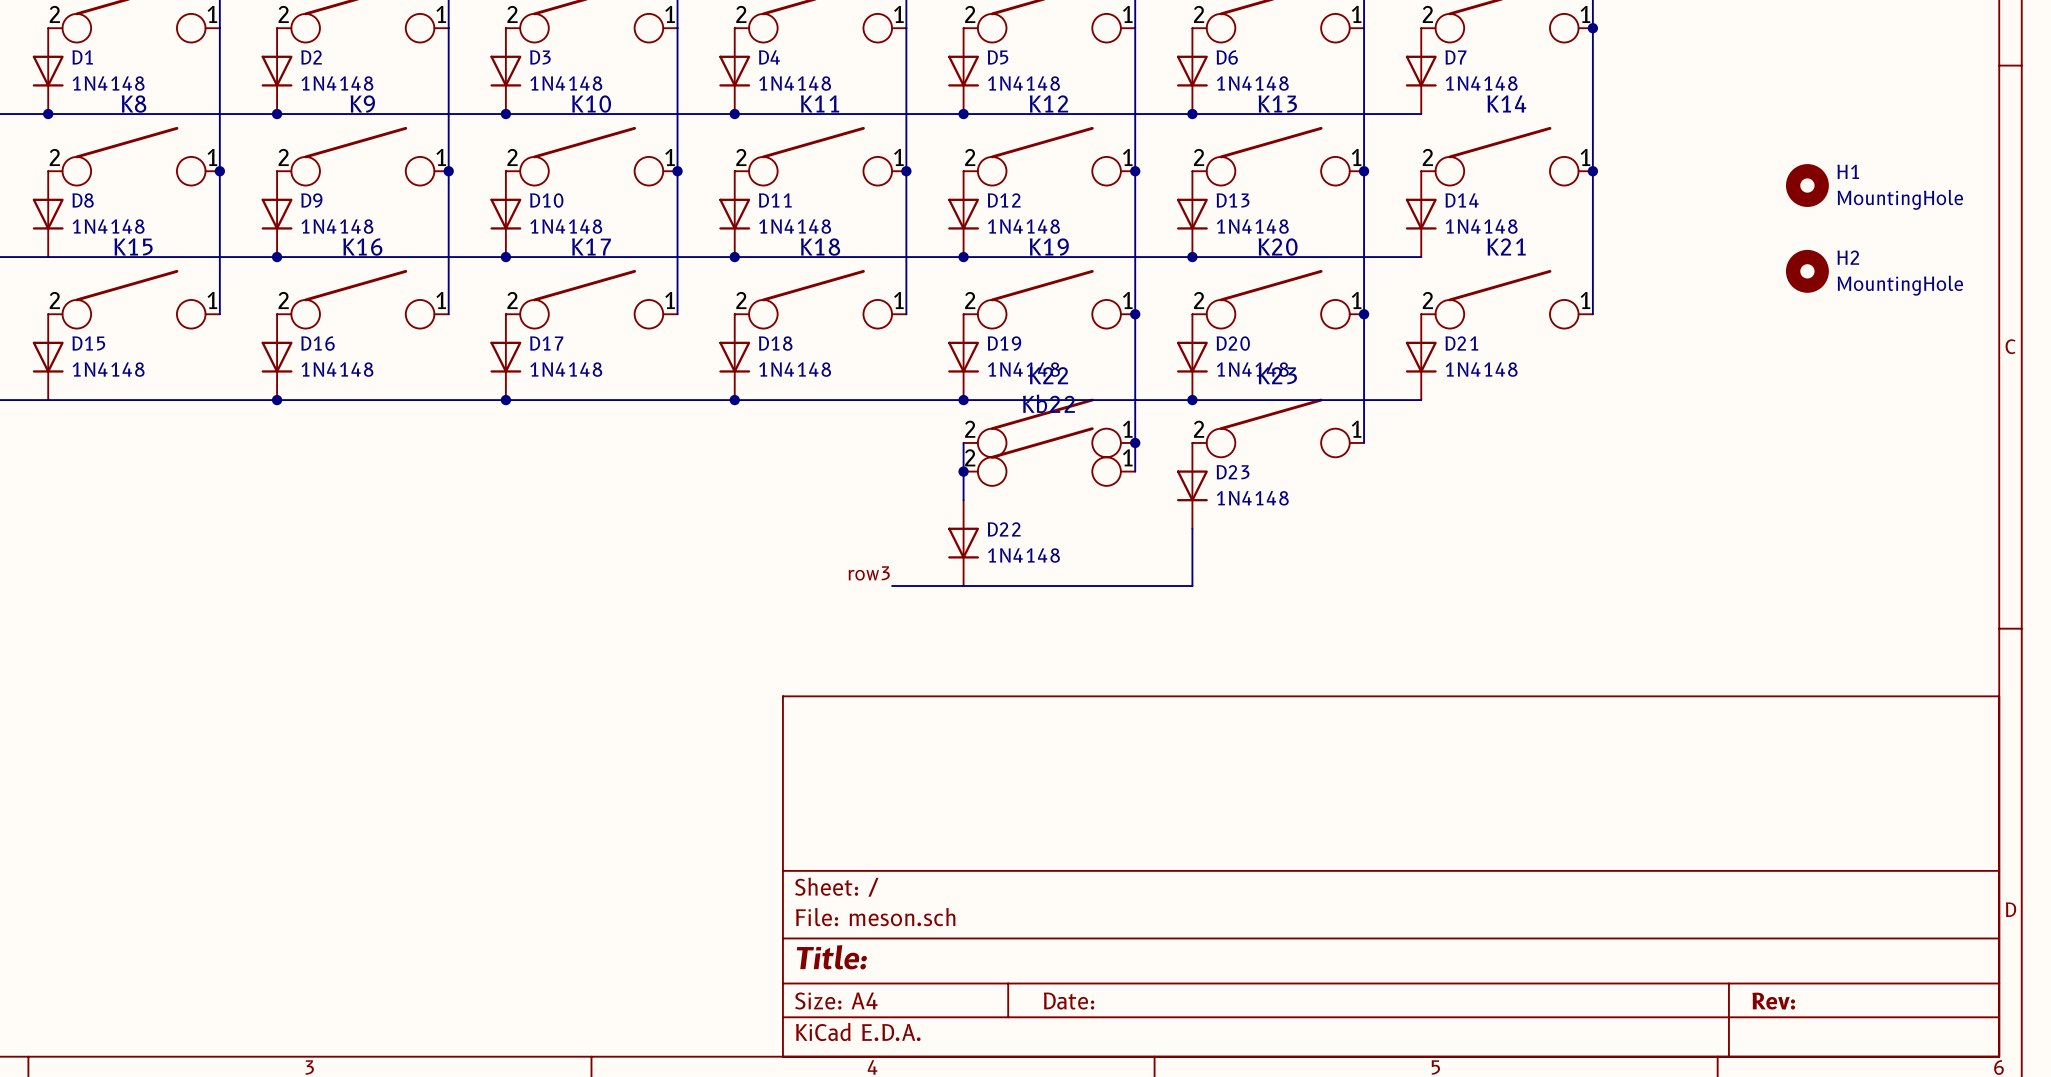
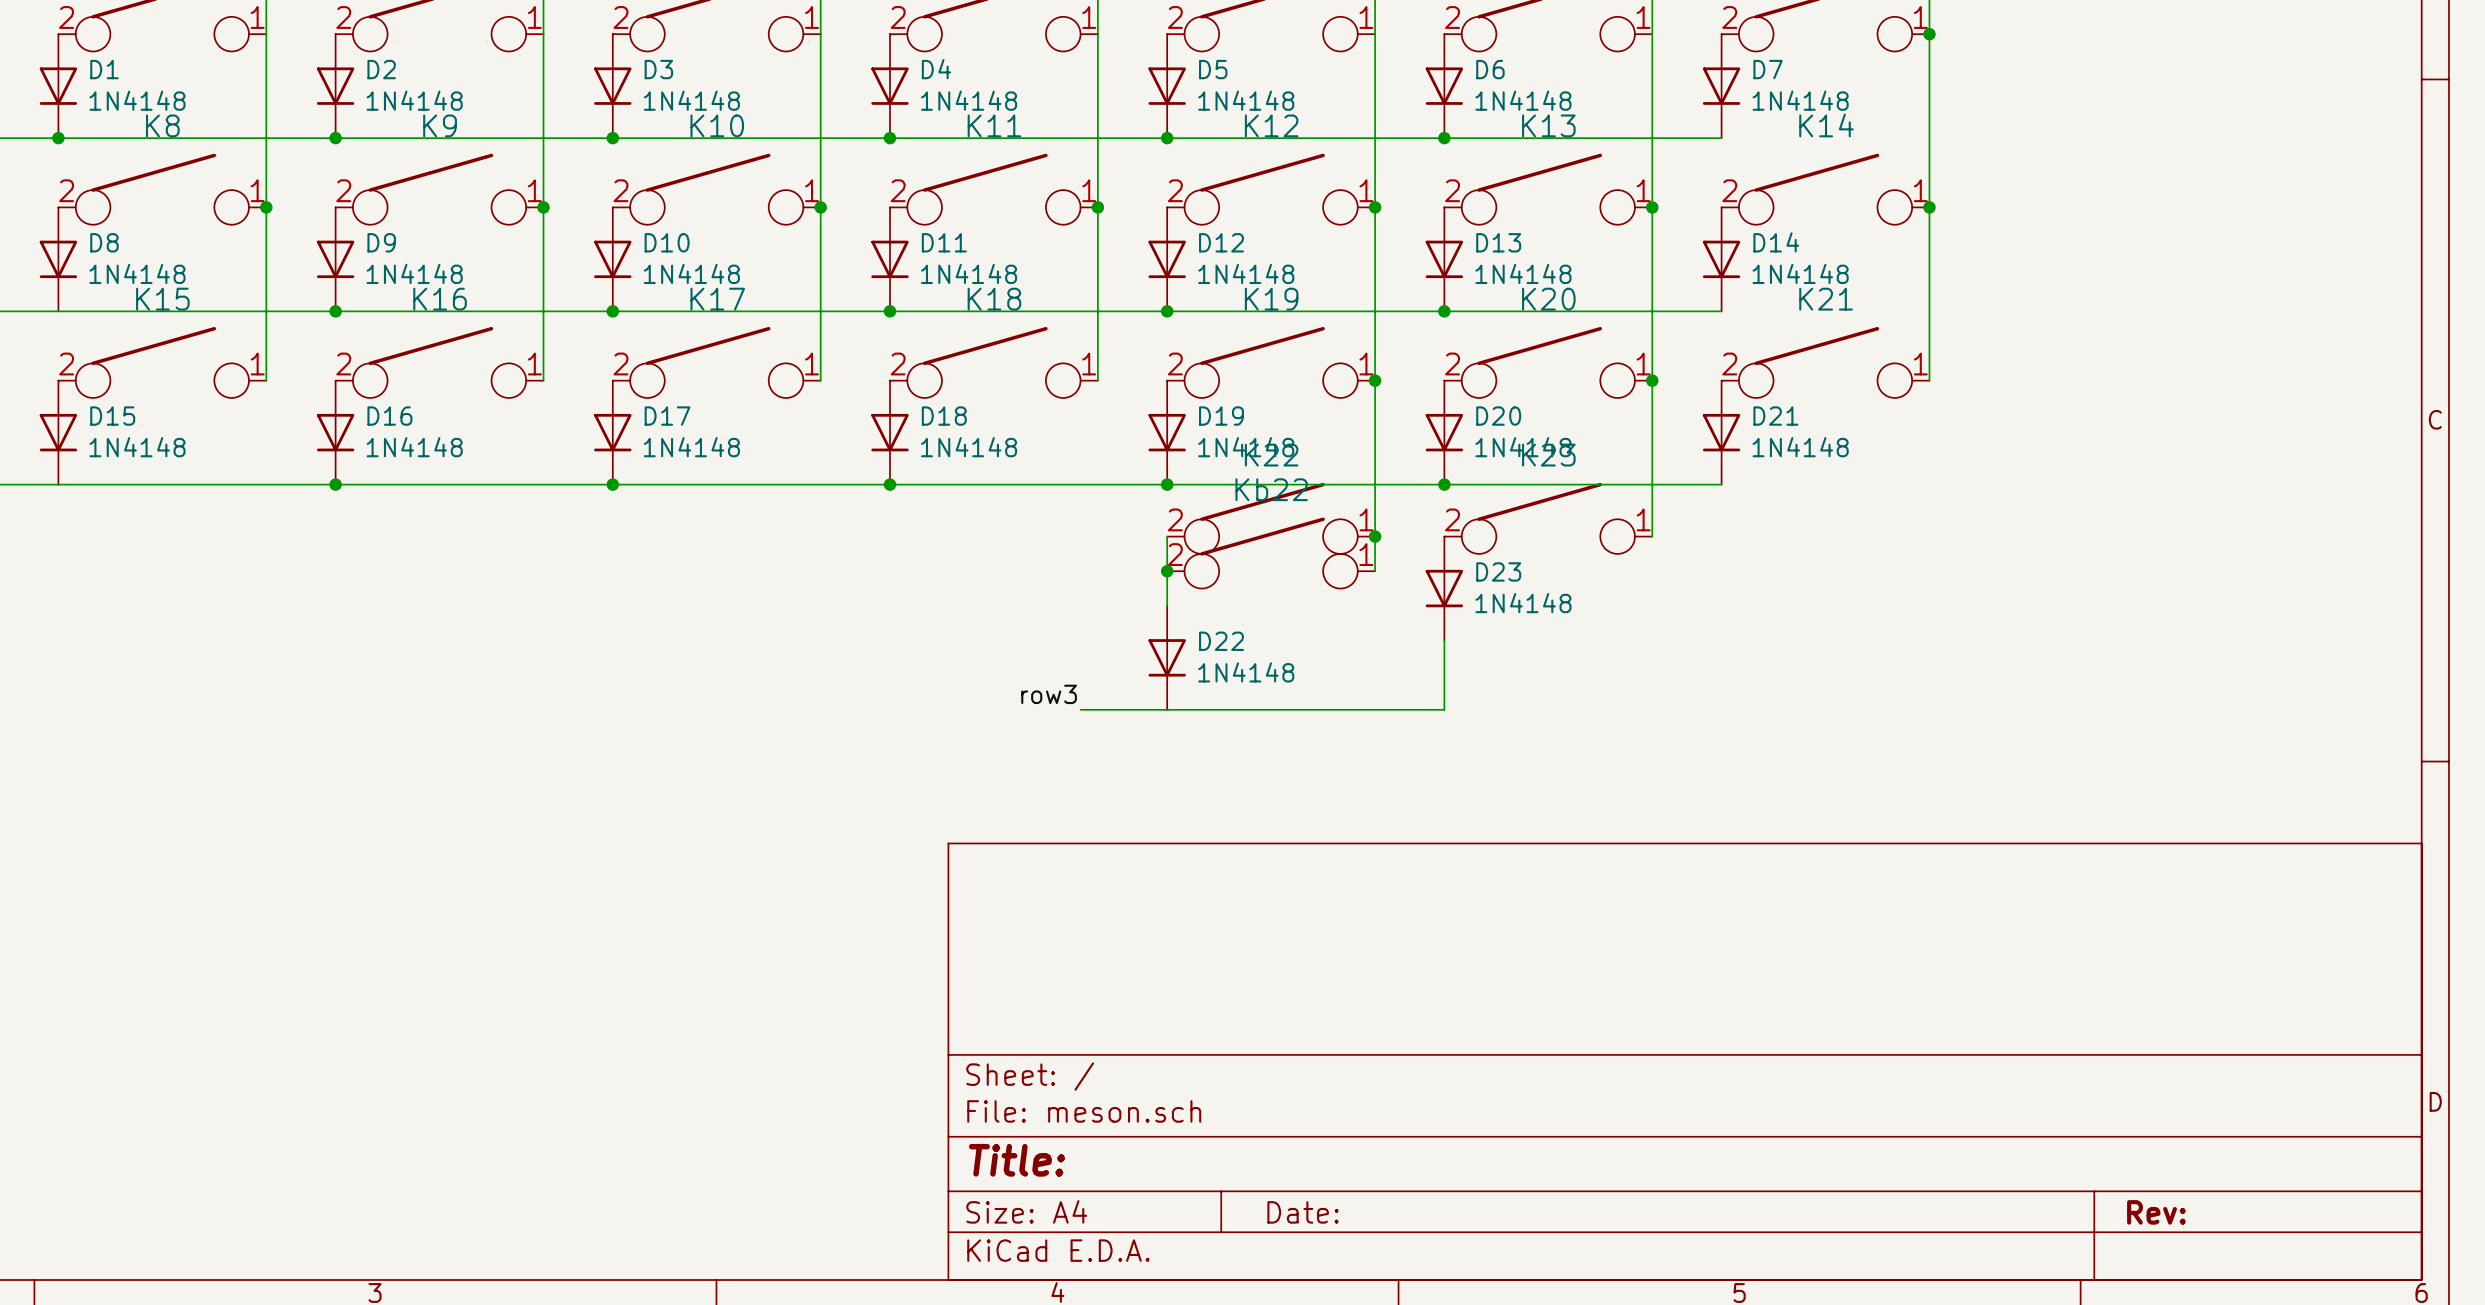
H1: MountingHole (1807, 185) -> none
H2: MountingHole (1807, 271) -> none

